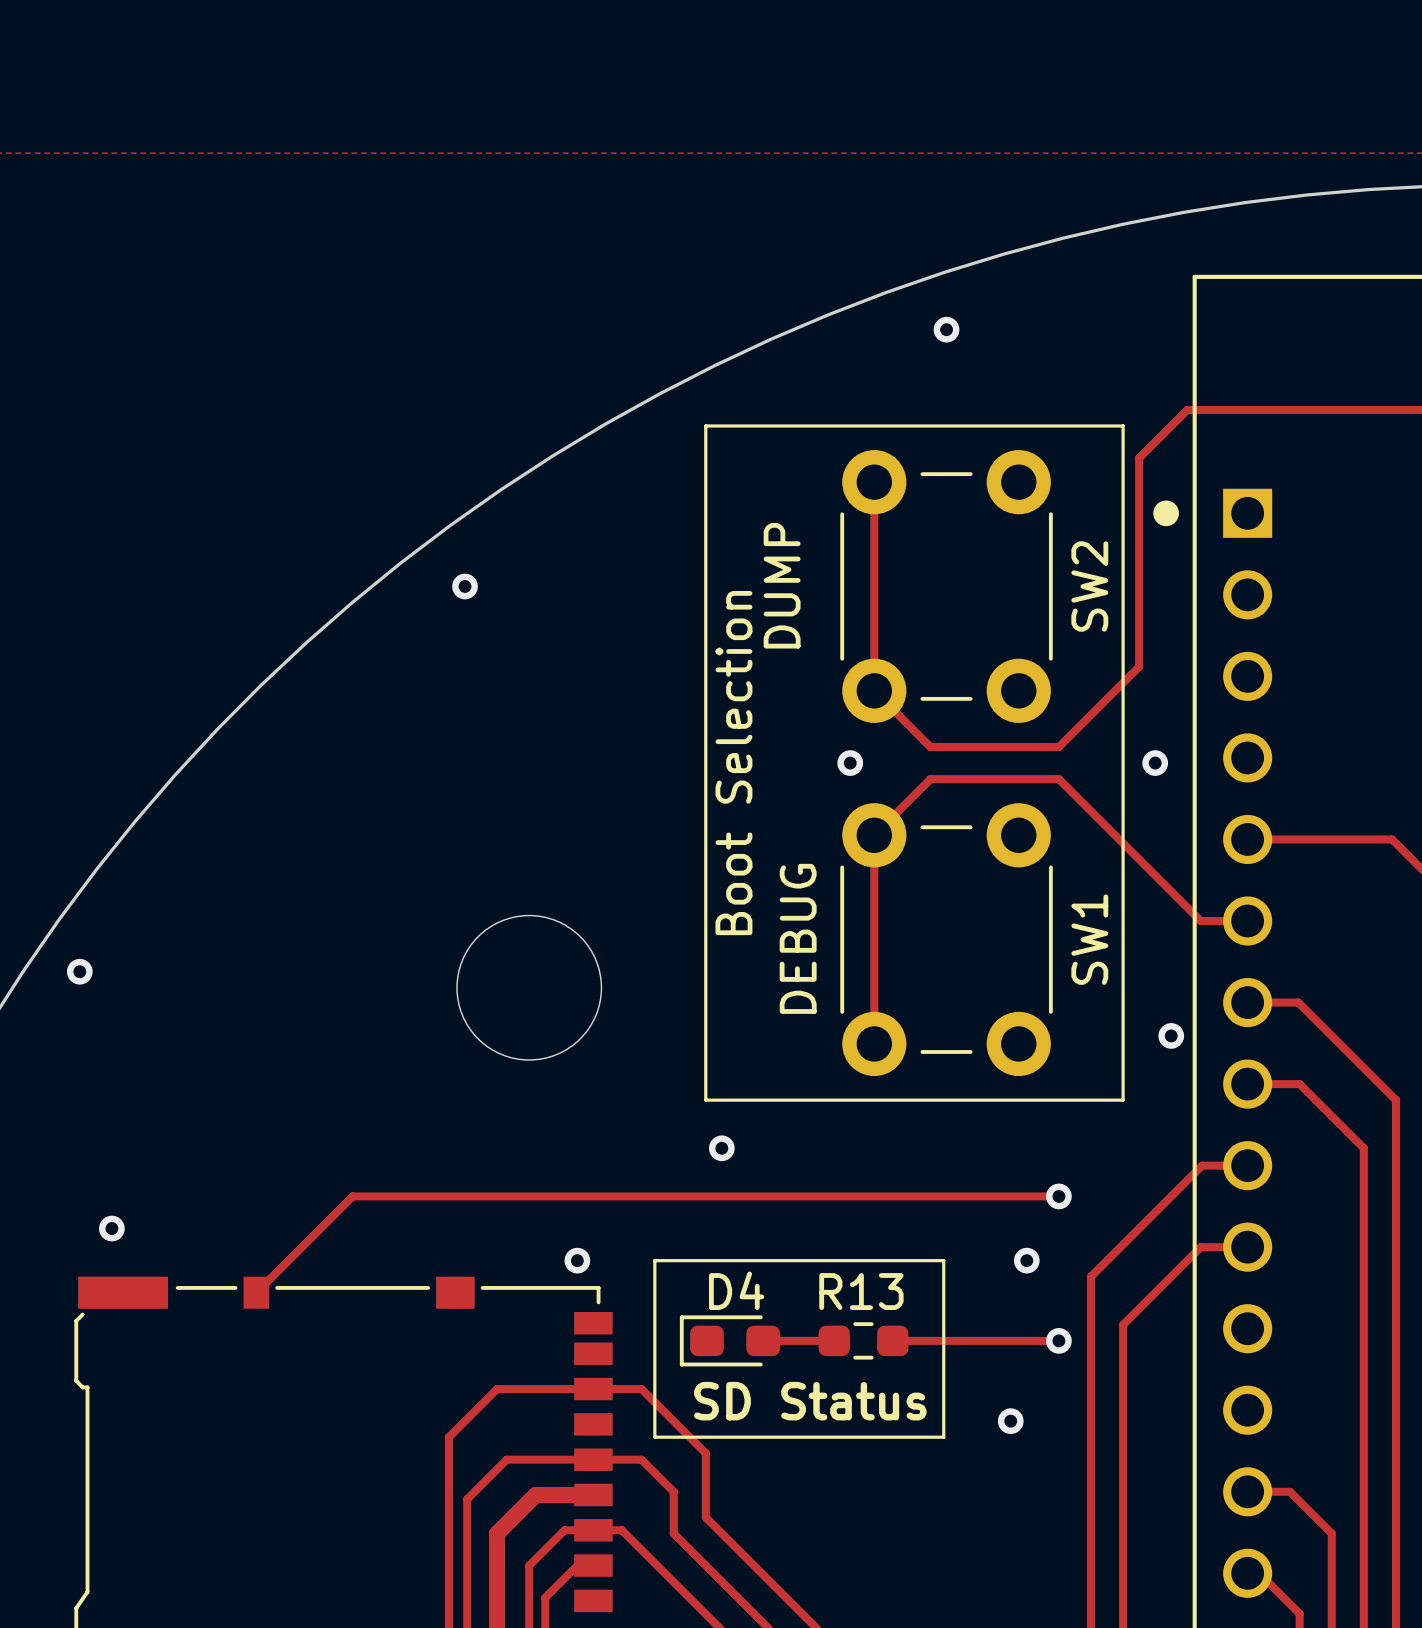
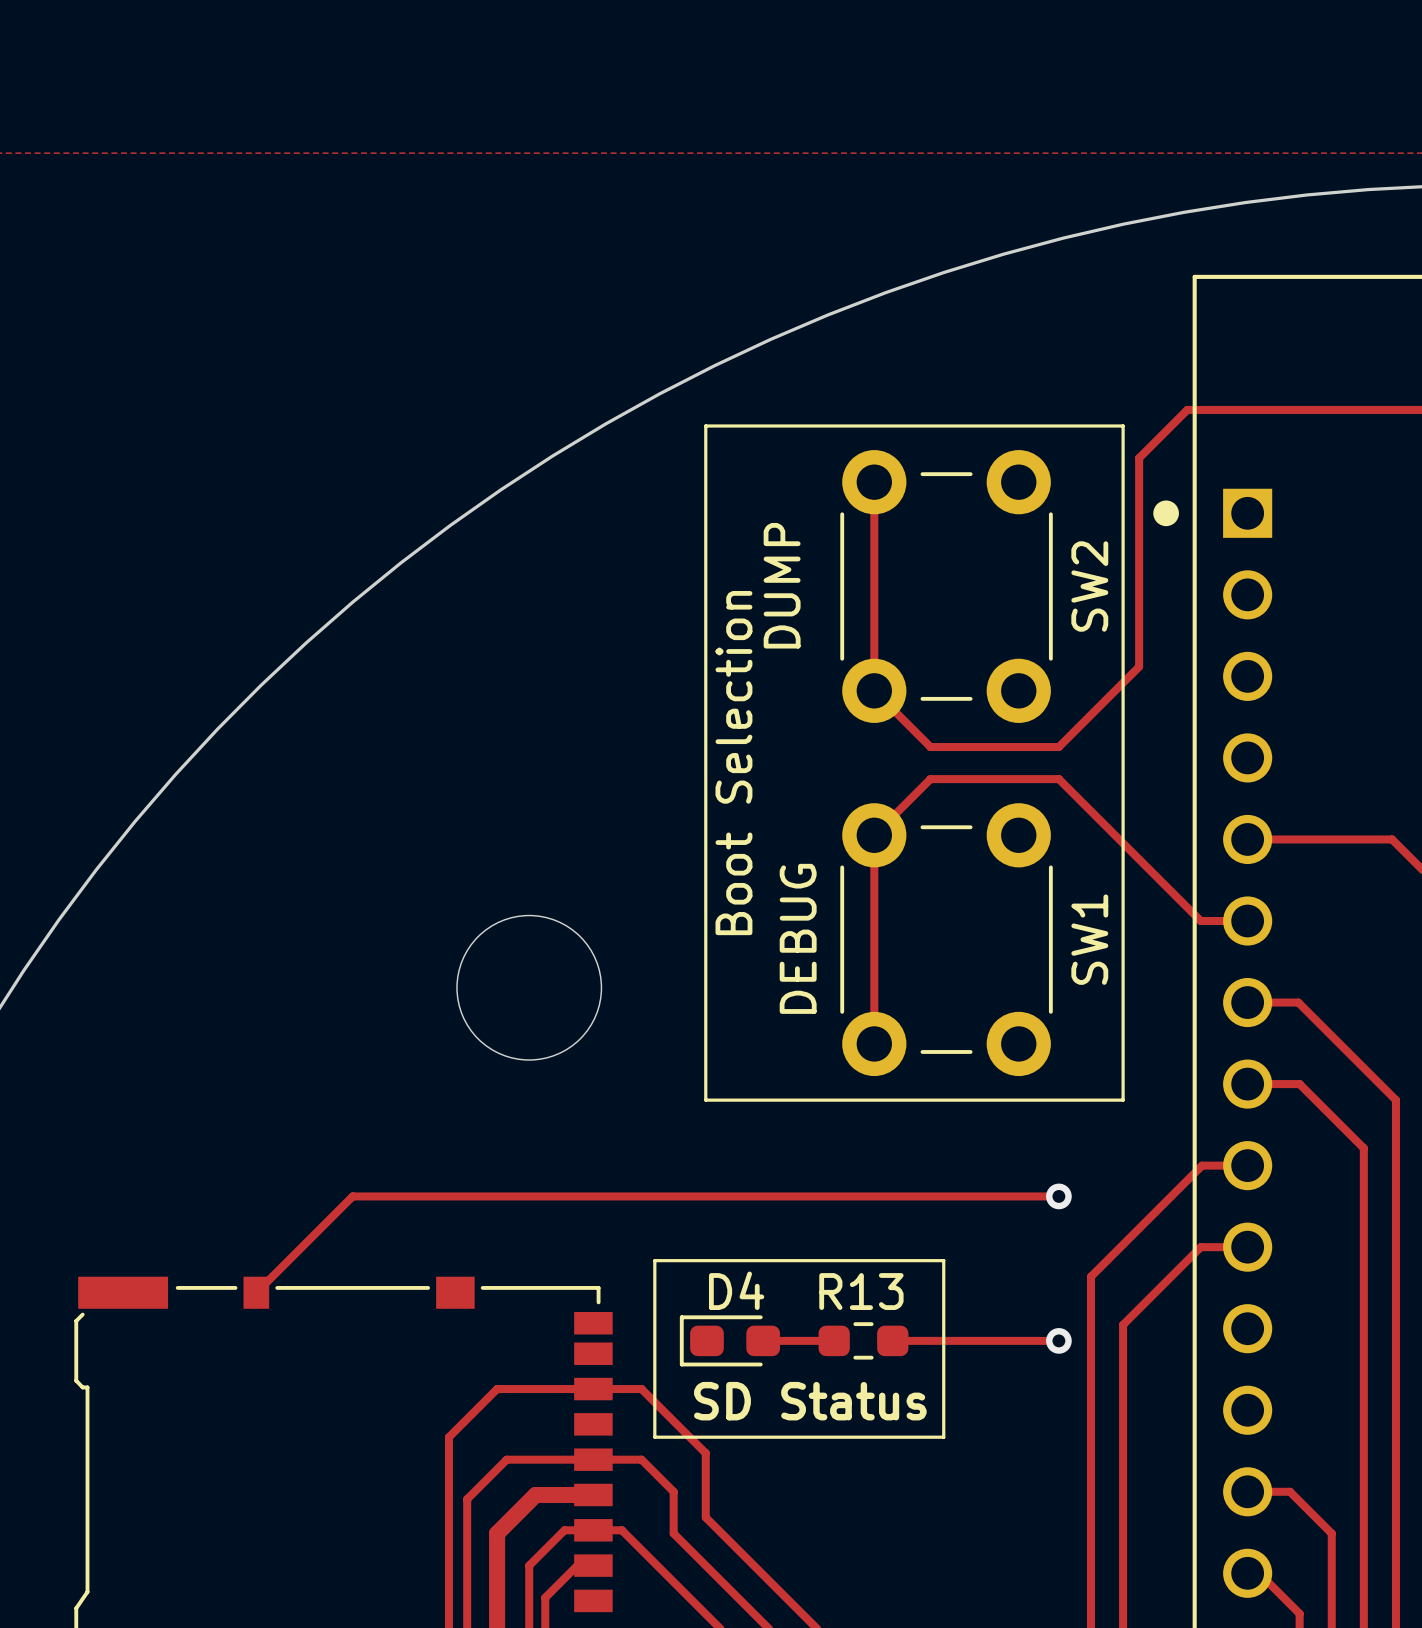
via: (946, 329) -> none
via: (465, 586) -> none
via: (850, 763) -> none
via: (1155, 763) -> none
via: (79, 971) -> none
via: (1171, 1035) -> none
via: (721, 1148) -> none
via: (111, 1228) -> none
via: (577, 1260) -> none
via: (1026, 1260) -> none
via: (1010, 1421) -> none

